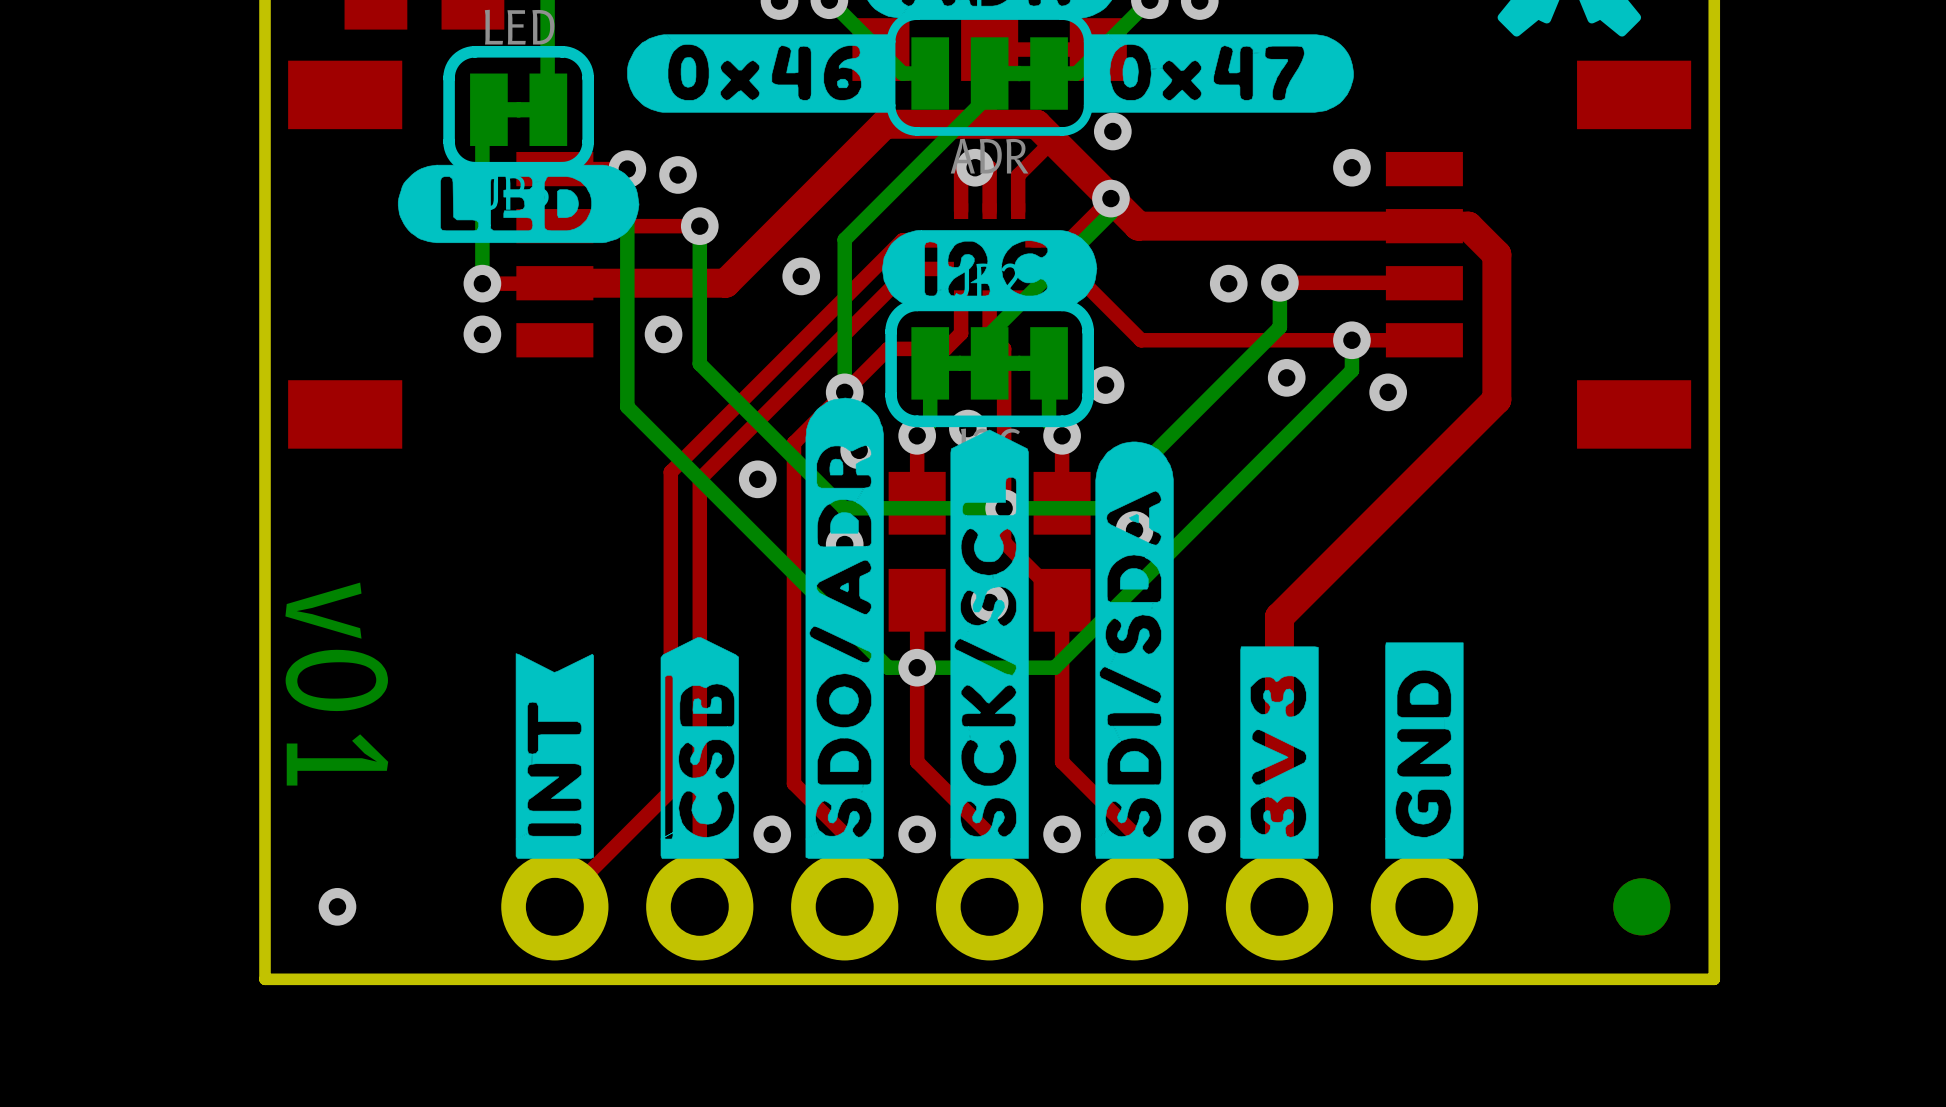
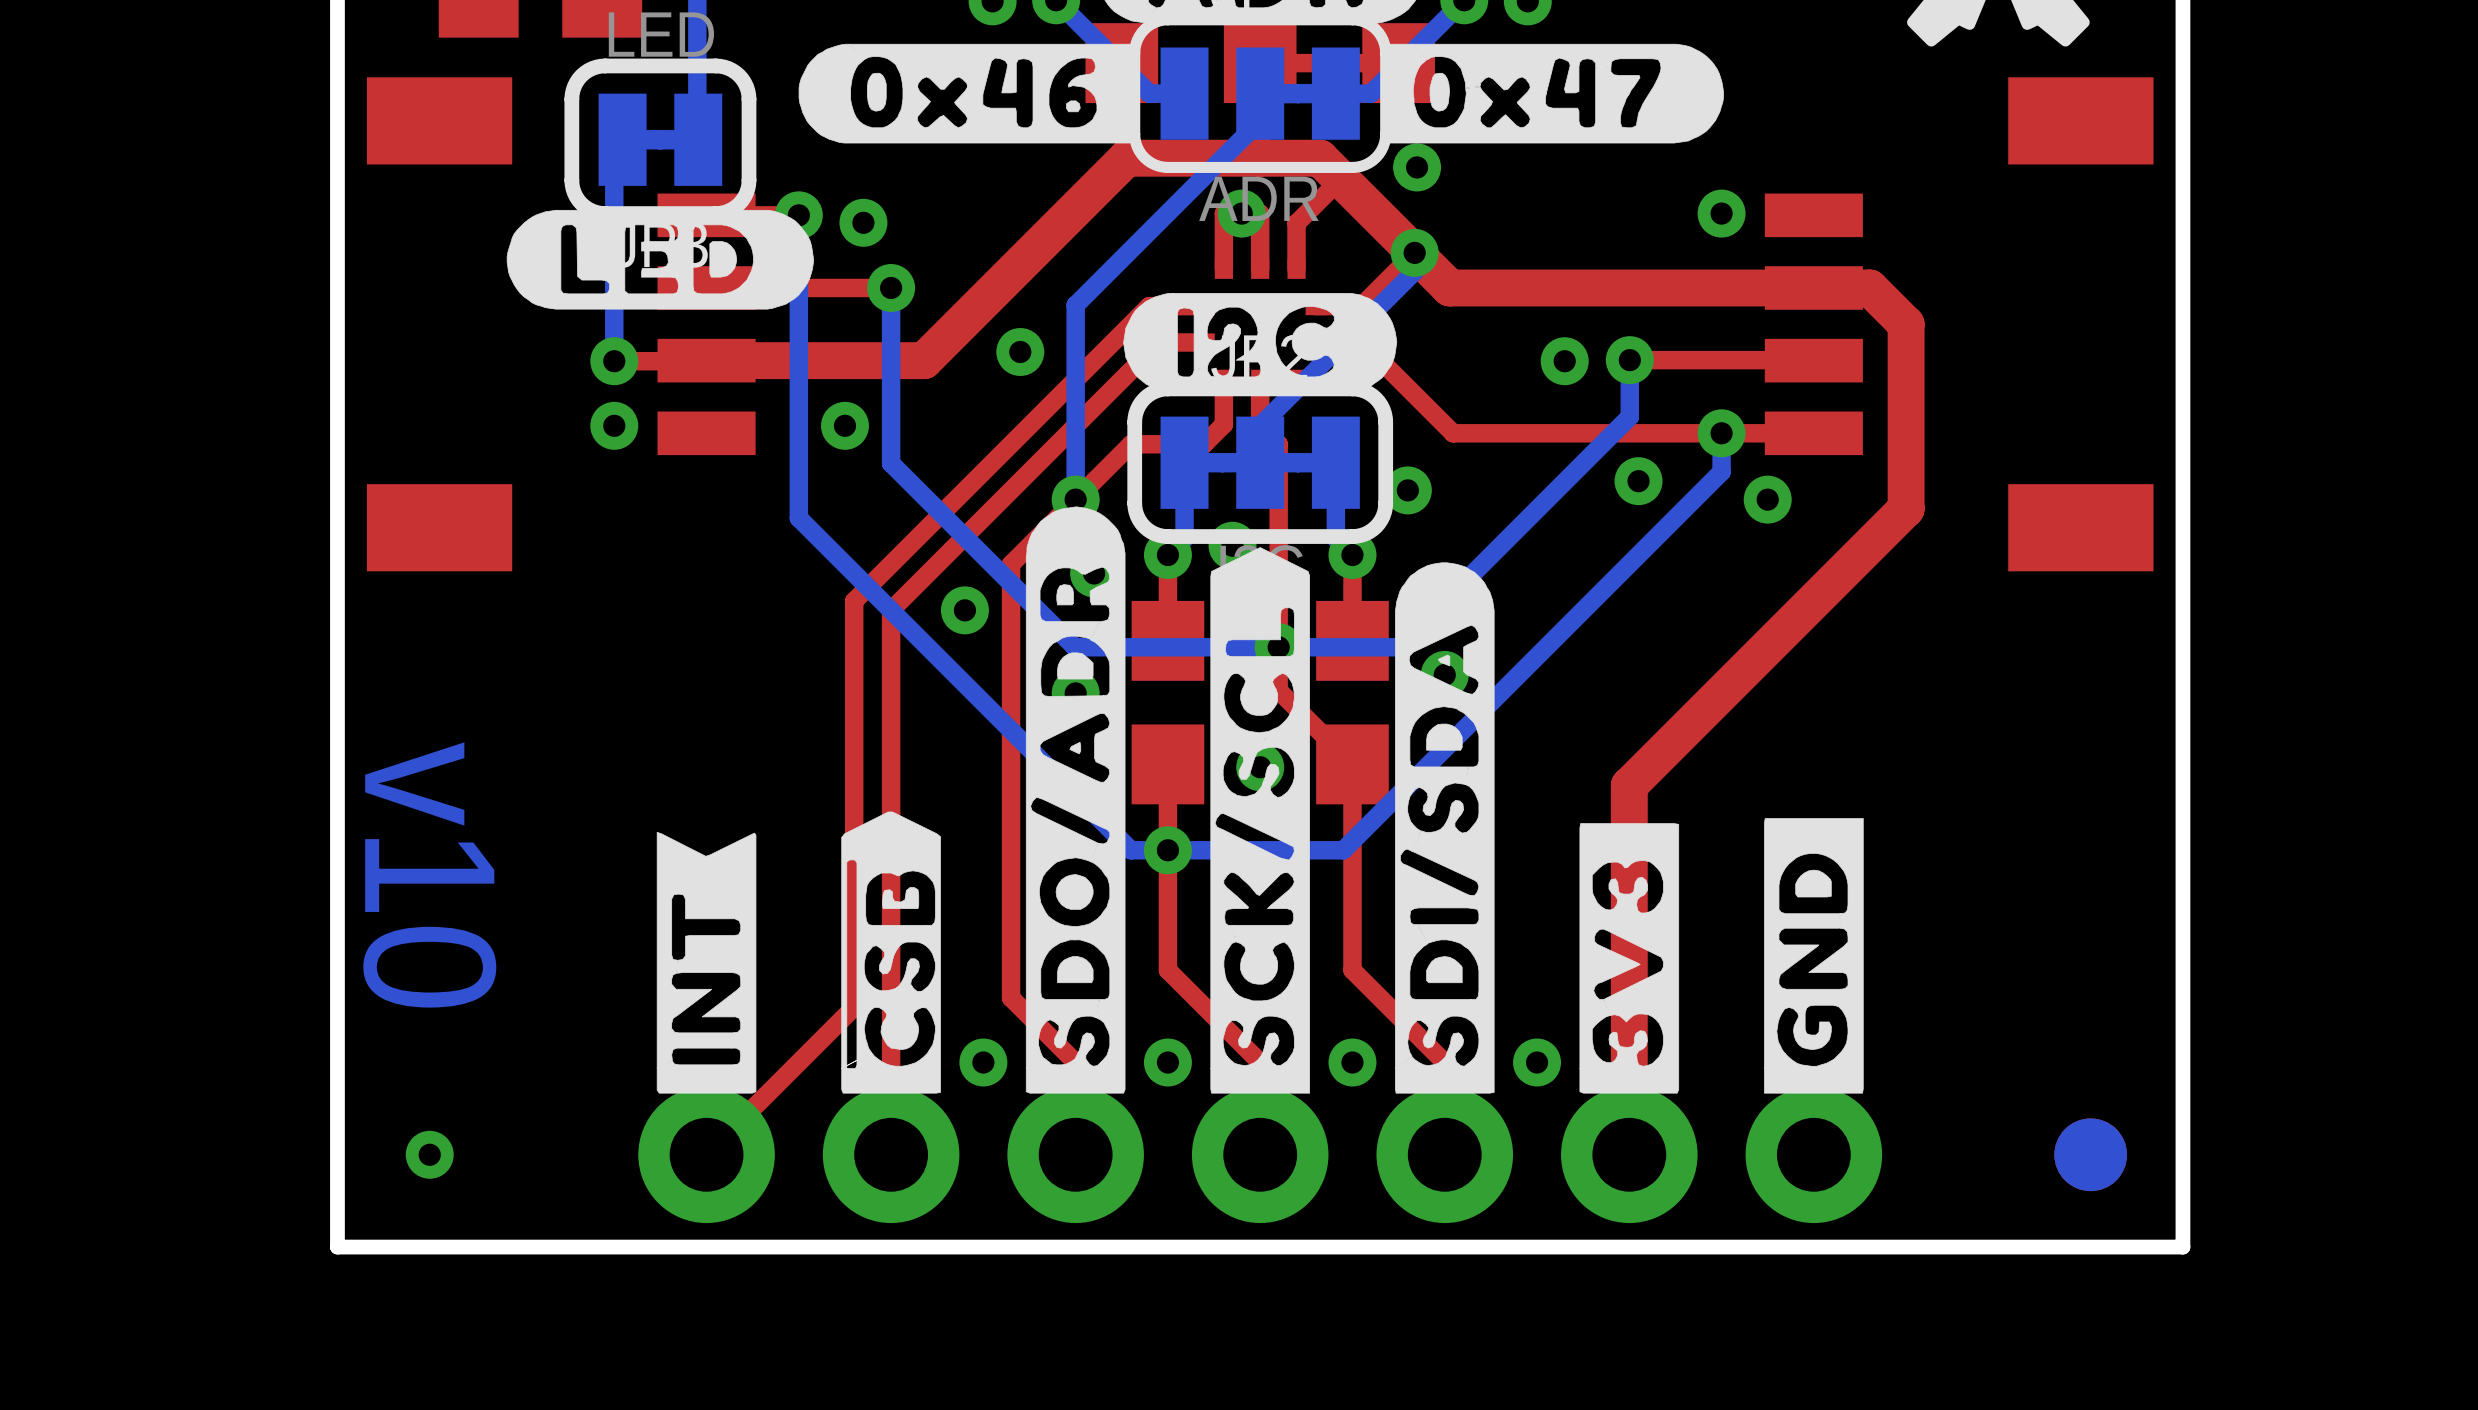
text: v01 (336, 684) -> v10 (429, 874)

